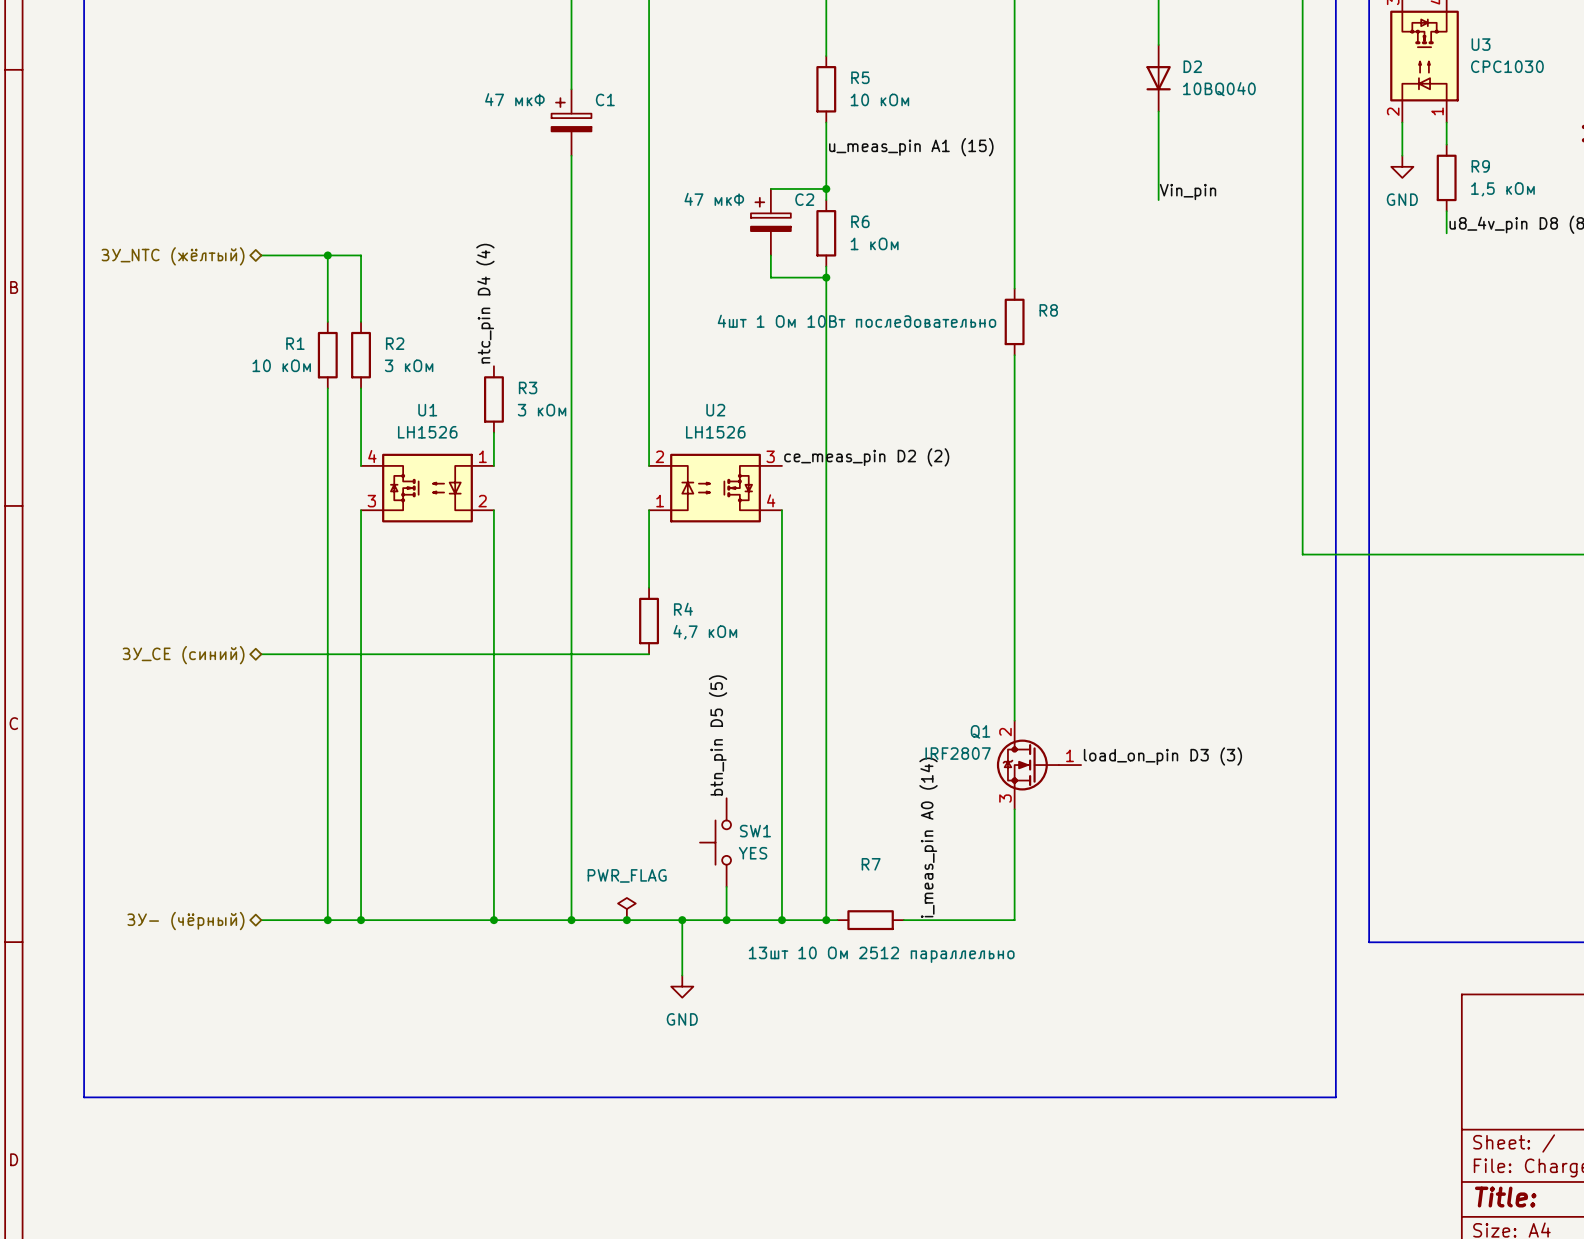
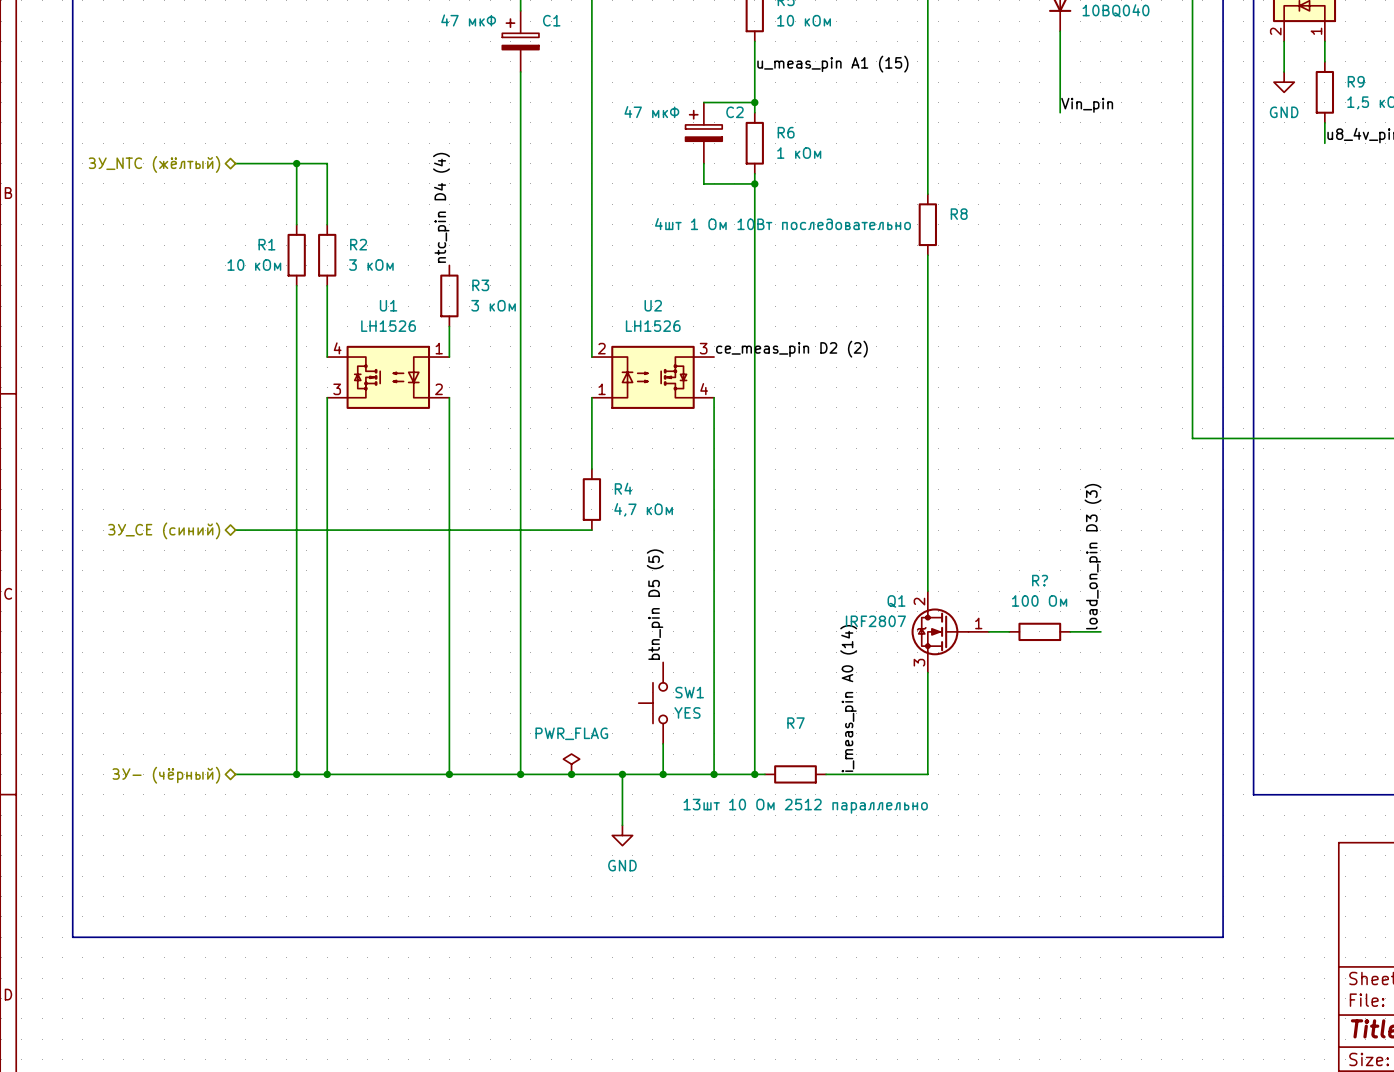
label rotation: 0° (1162, 756) -> 90° counterclockwise (1093, 556)
wire: none -> (988, 631) (1009, 631)
R?: none -> 100 Ом (1039, 631)
wire: none -> (1070, 631) (1100, 631)

